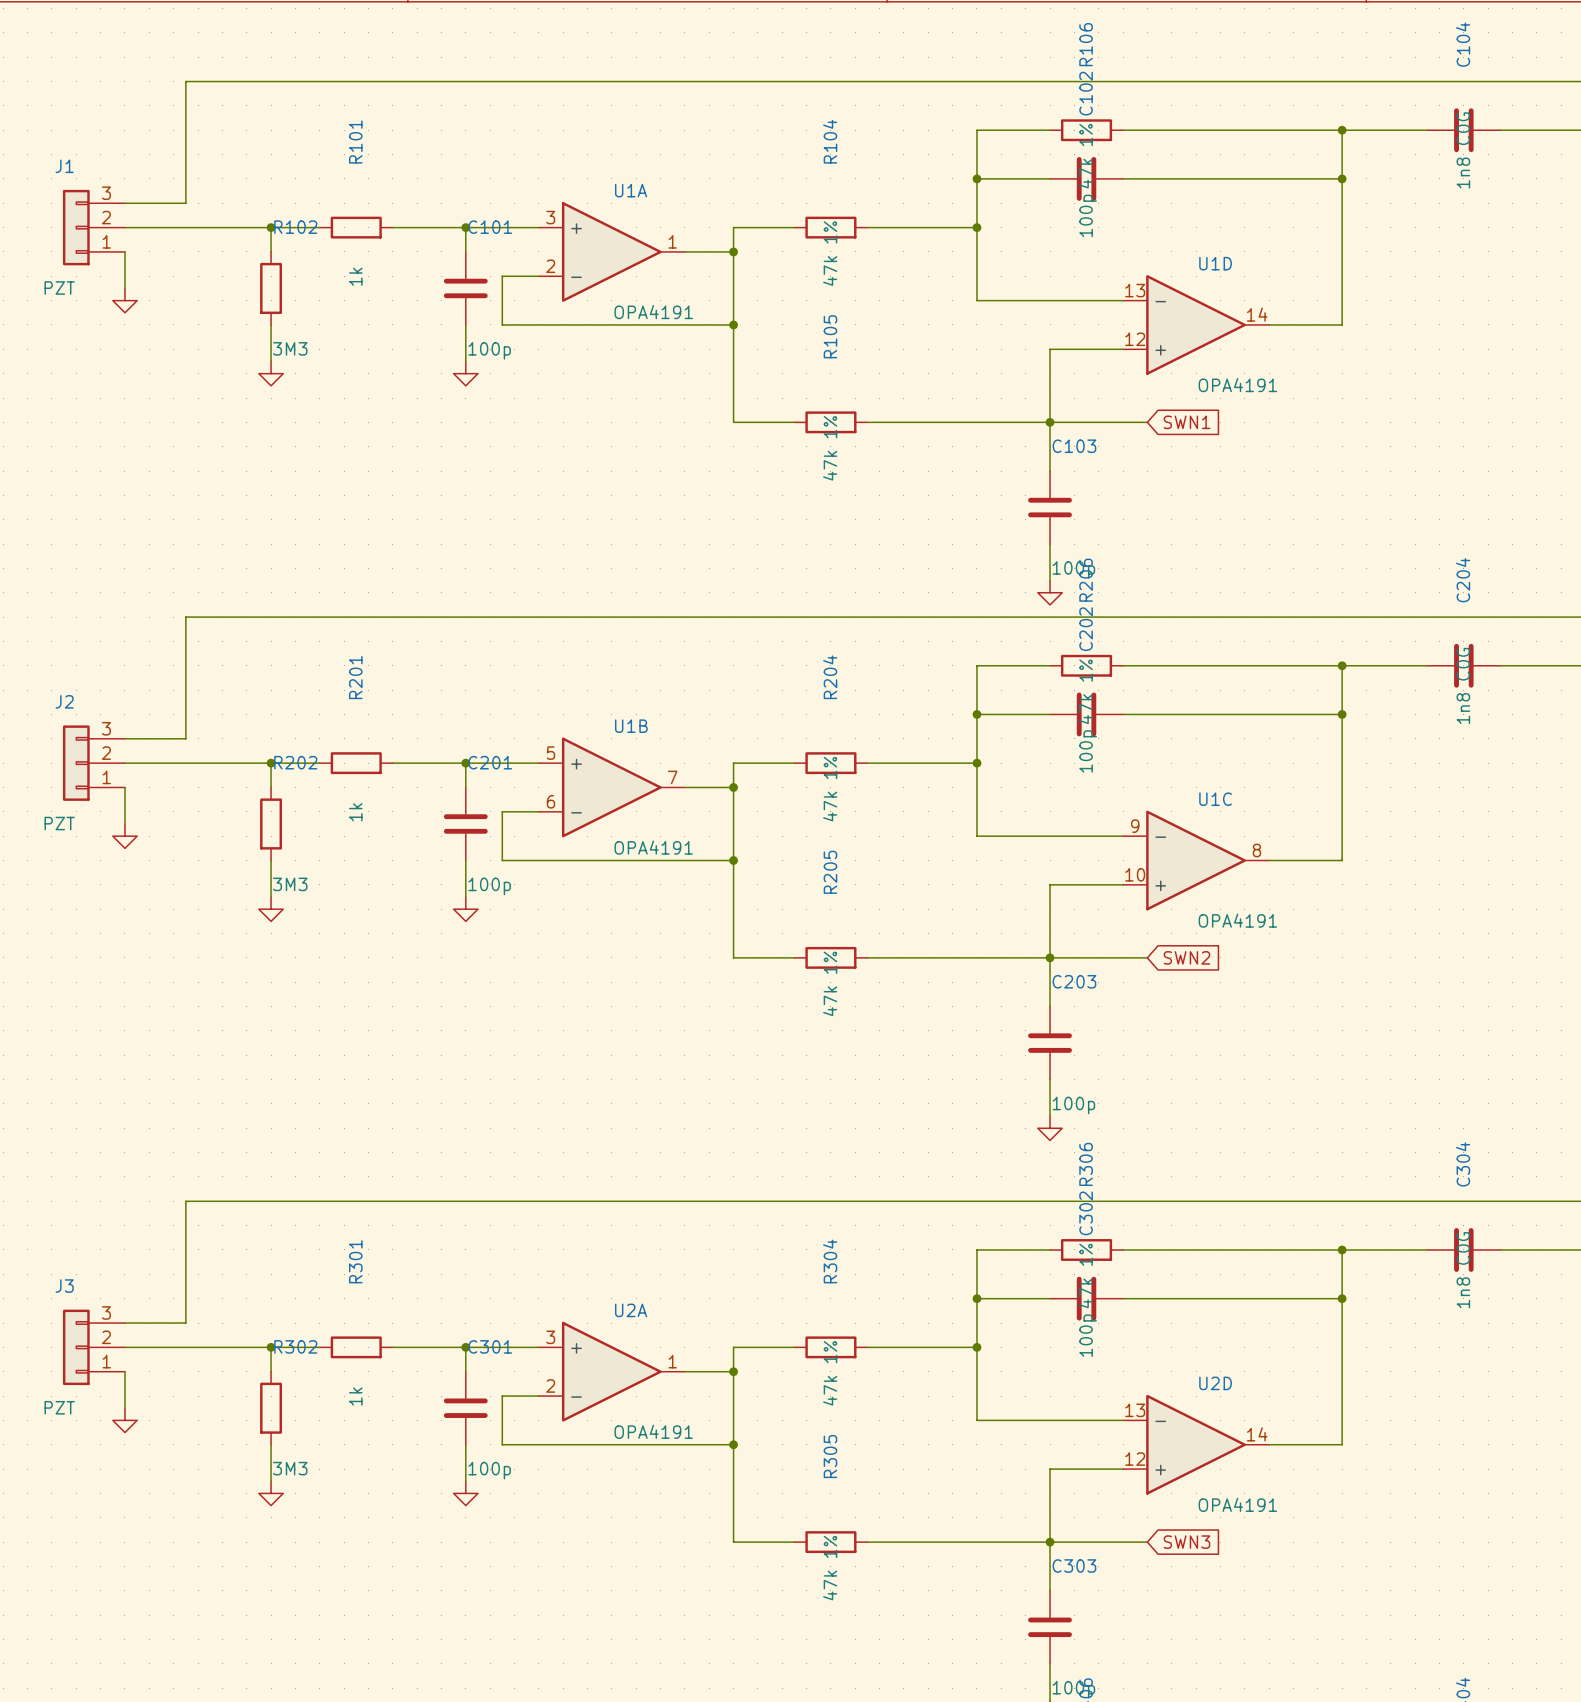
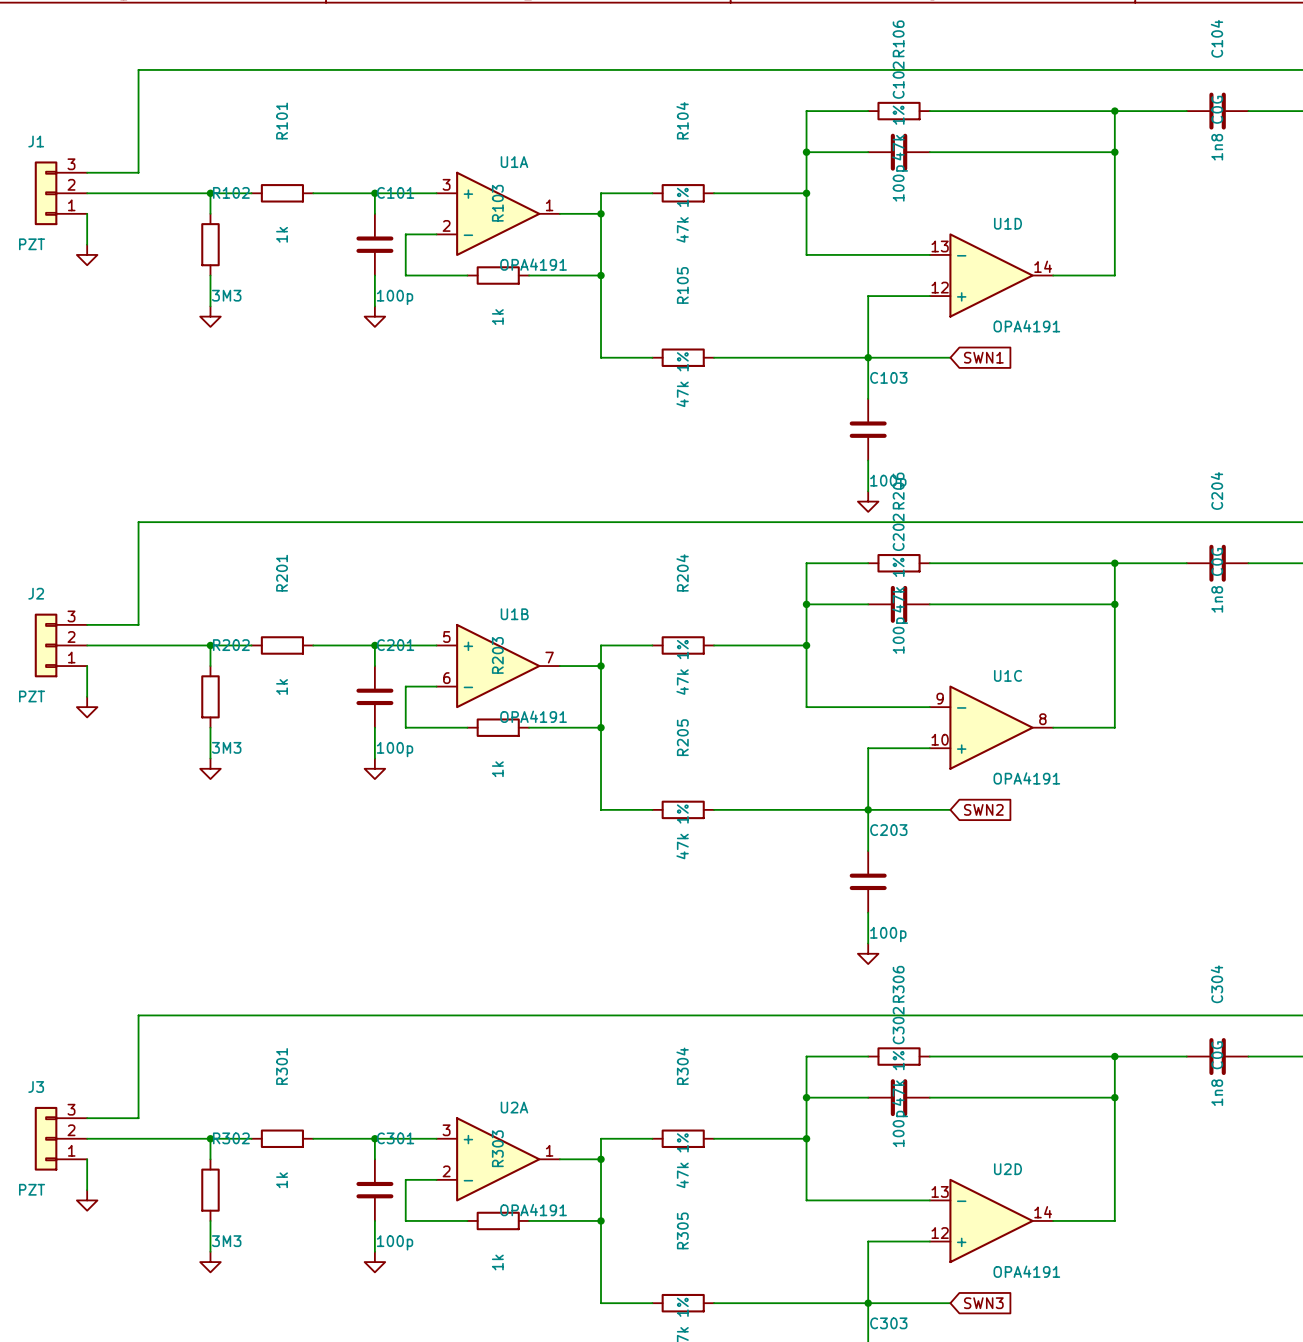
wire: (575, 324) (648, 324) -> none
R103: none -> 1k (498, 275)
wire: (575, 860) (648, 860) -> none
R203: none -> 1k (498, 727)
wire: (575, 1444) (648, 1444) -> none
R303: none -> 1k (498, 1220)

